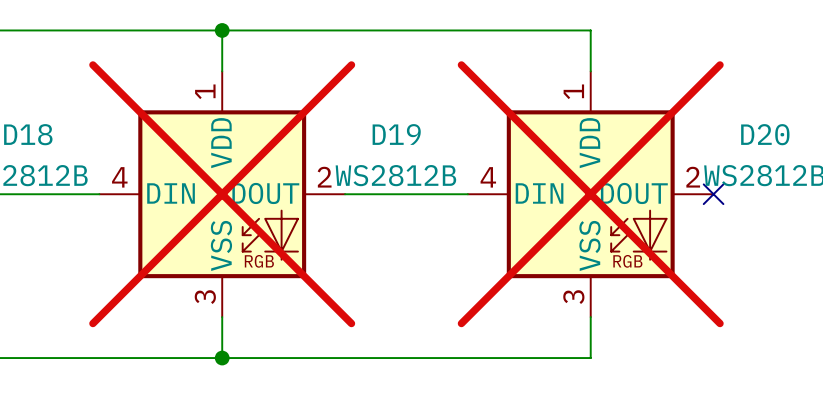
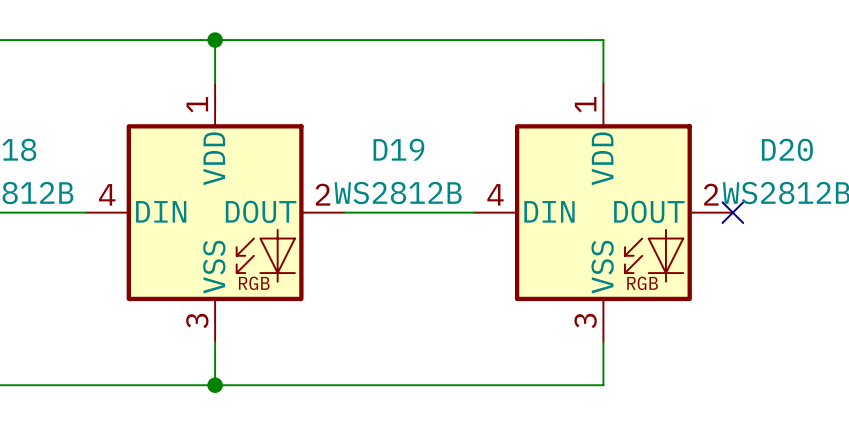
D19 do-not-place cross: (222, 194) -> none
D20 do-not-place cross: (590, 194) -> none

